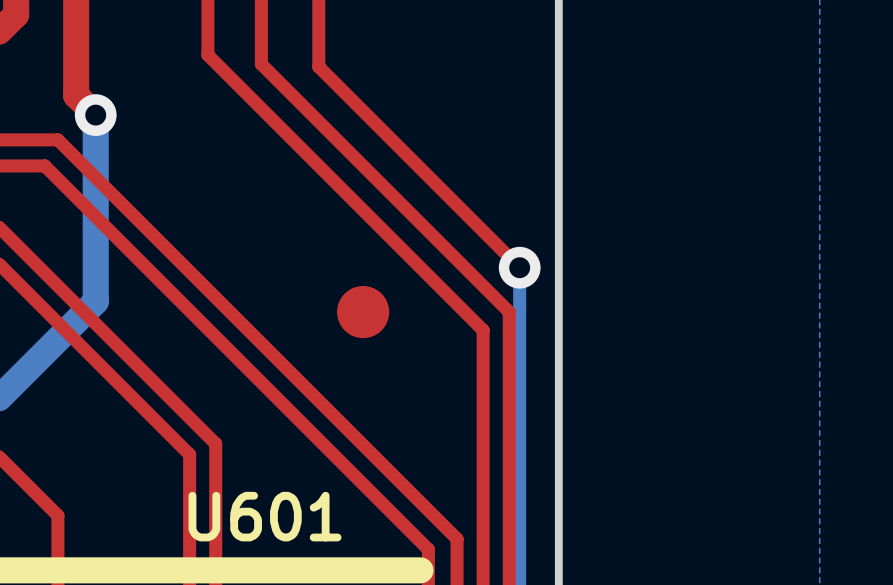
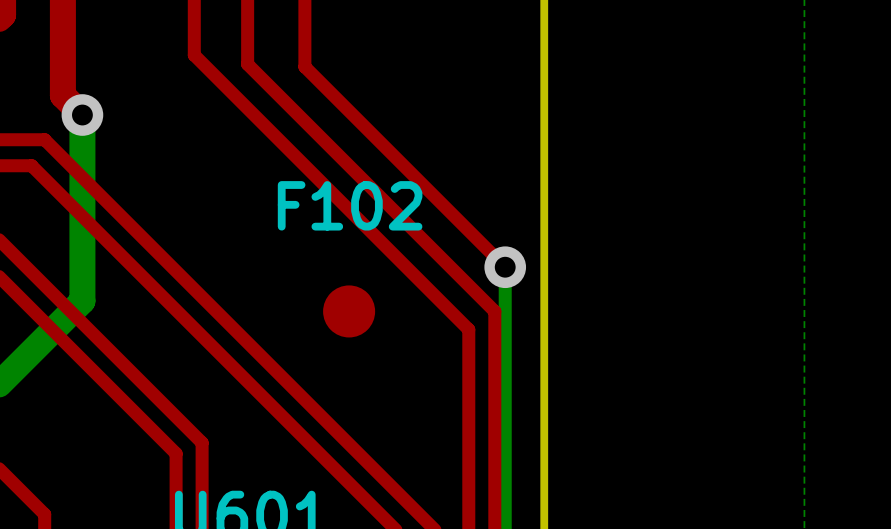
F102 name: none -> F102 (350, 205)

